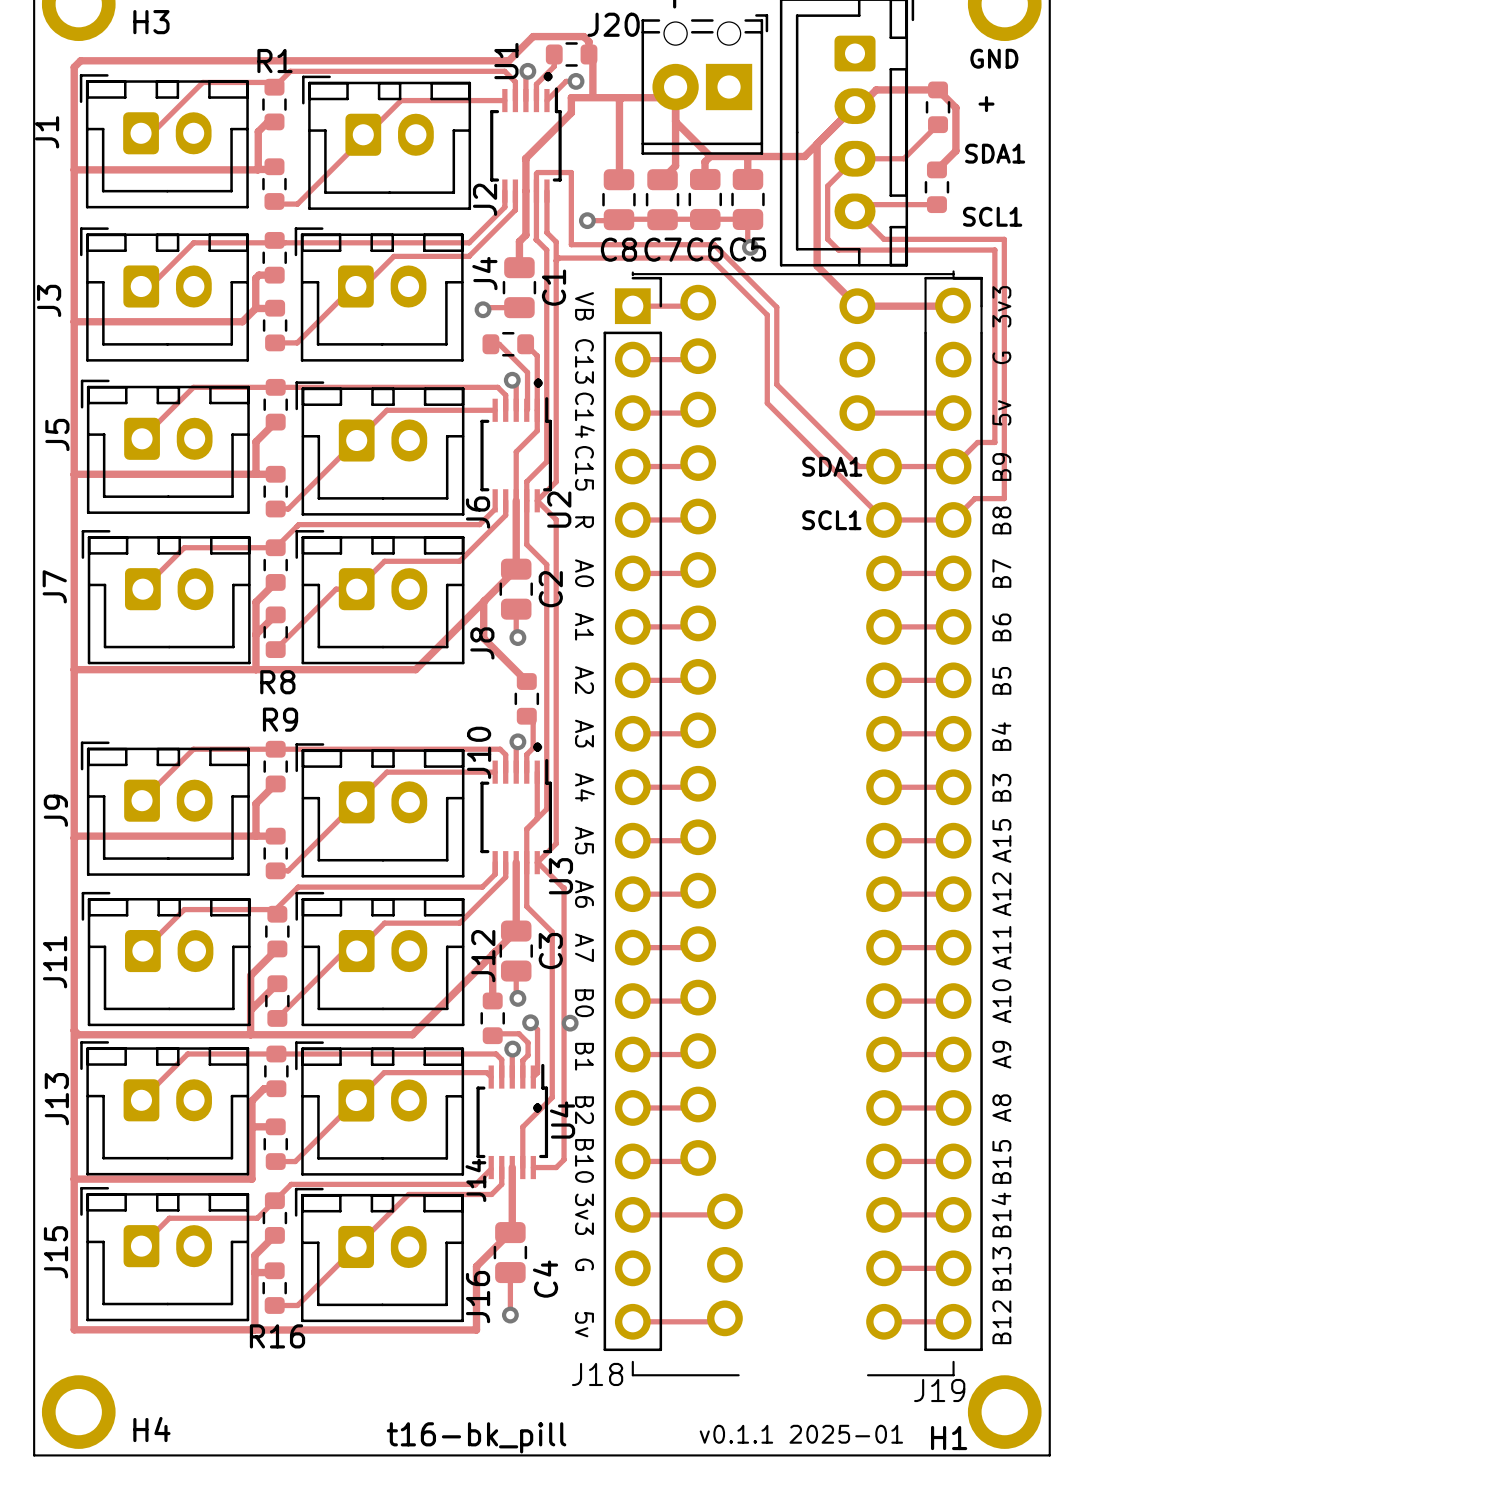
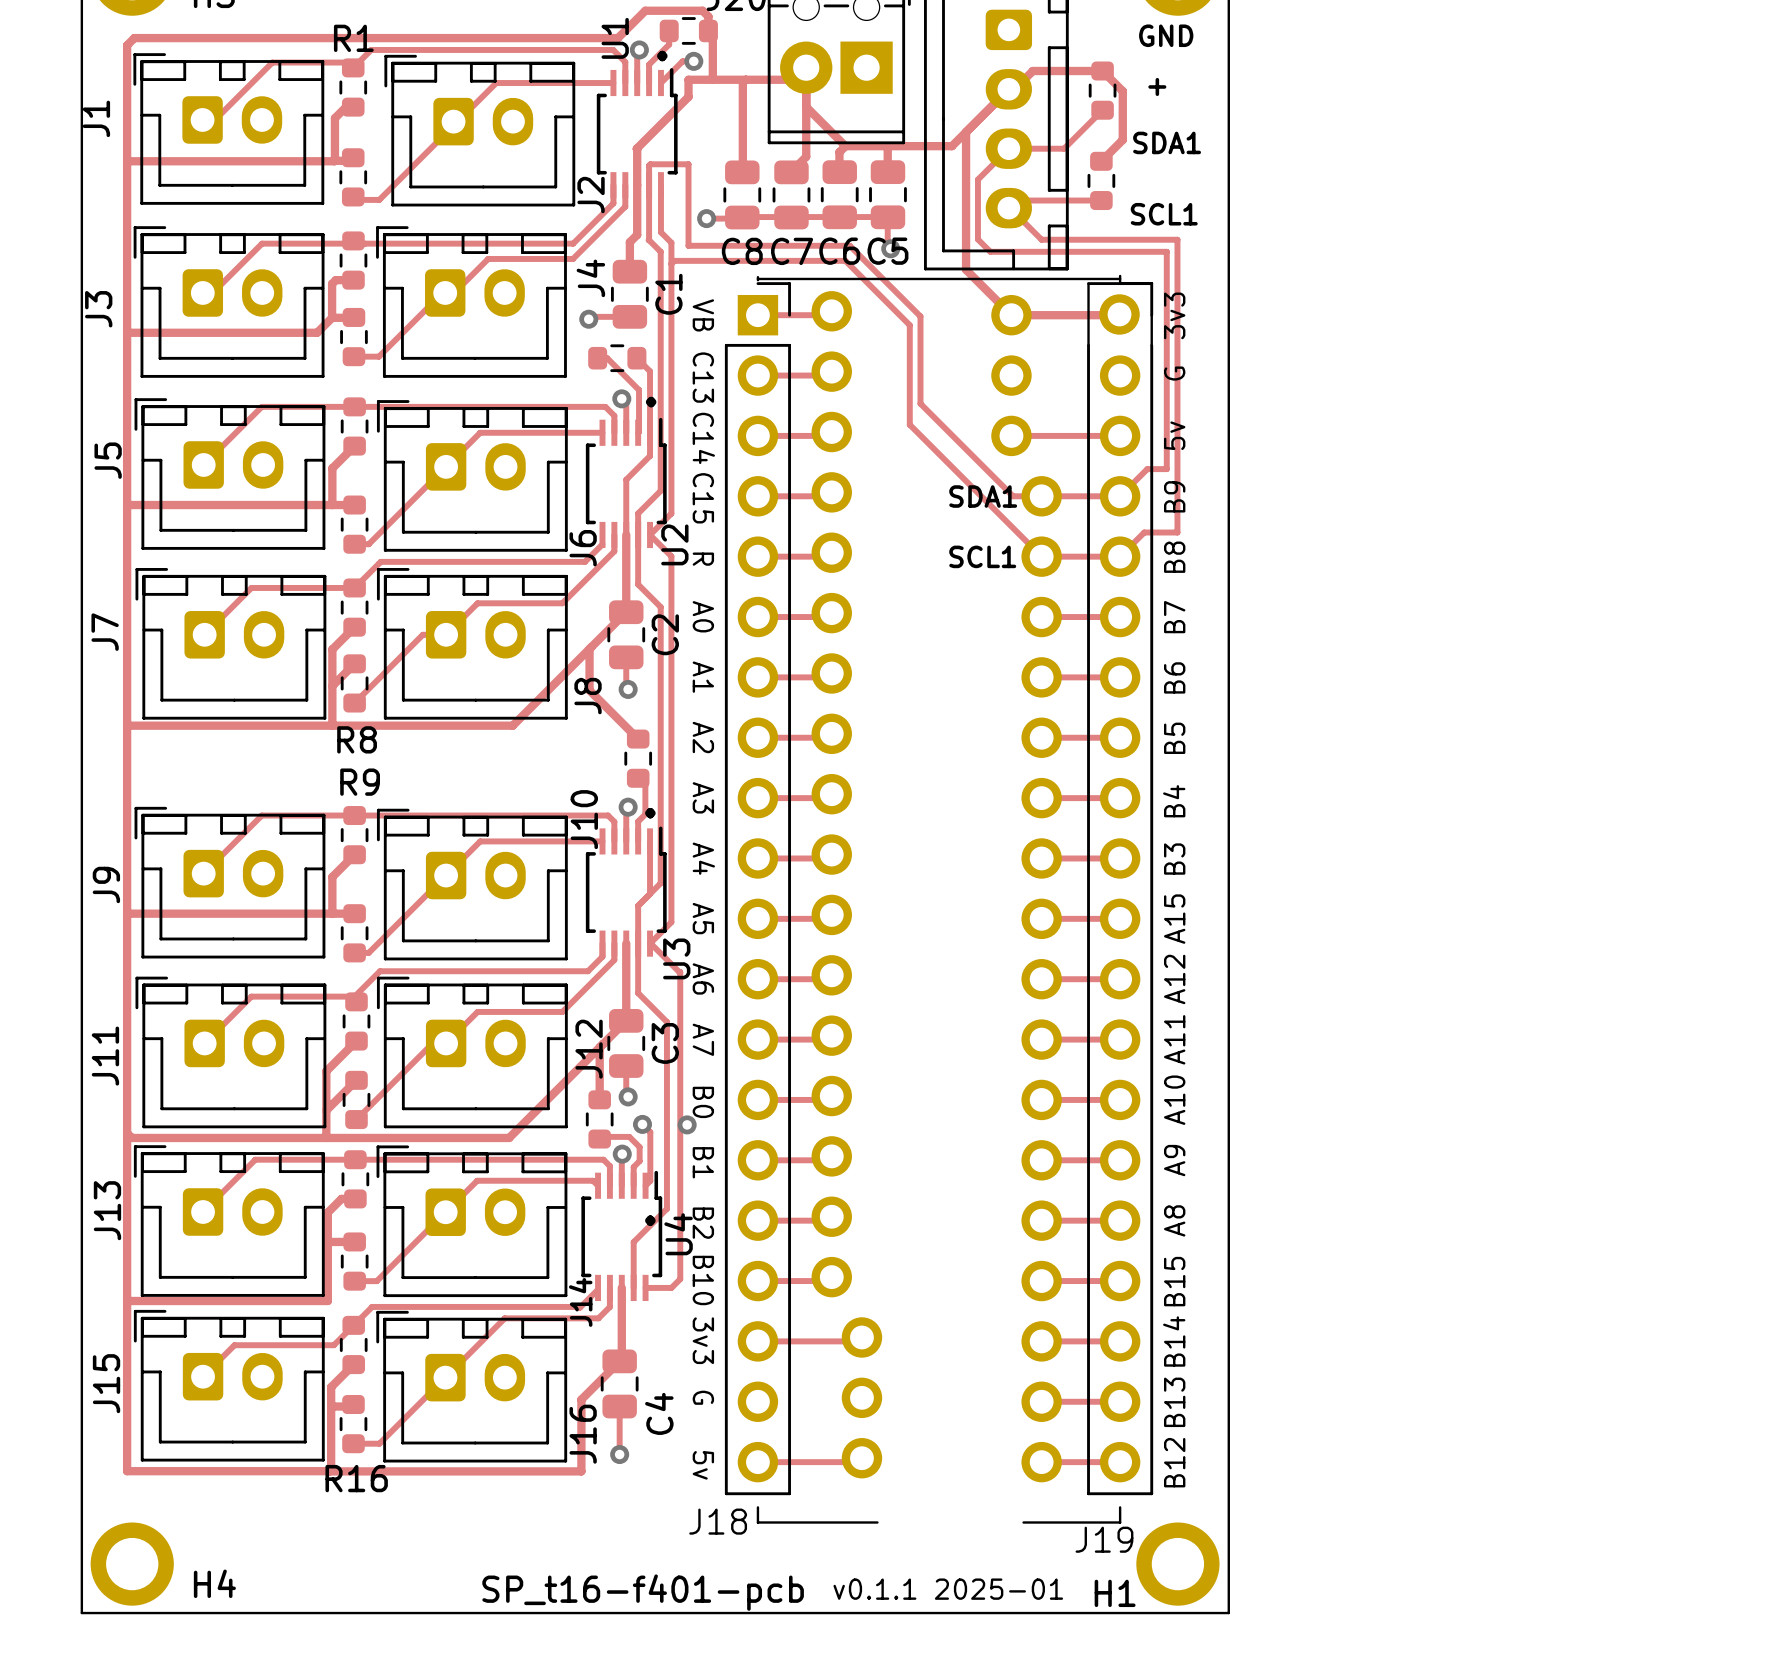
text: t16-bk_pill (476, 1437) -> SP_t16-f401-pcb (643, 1592)

